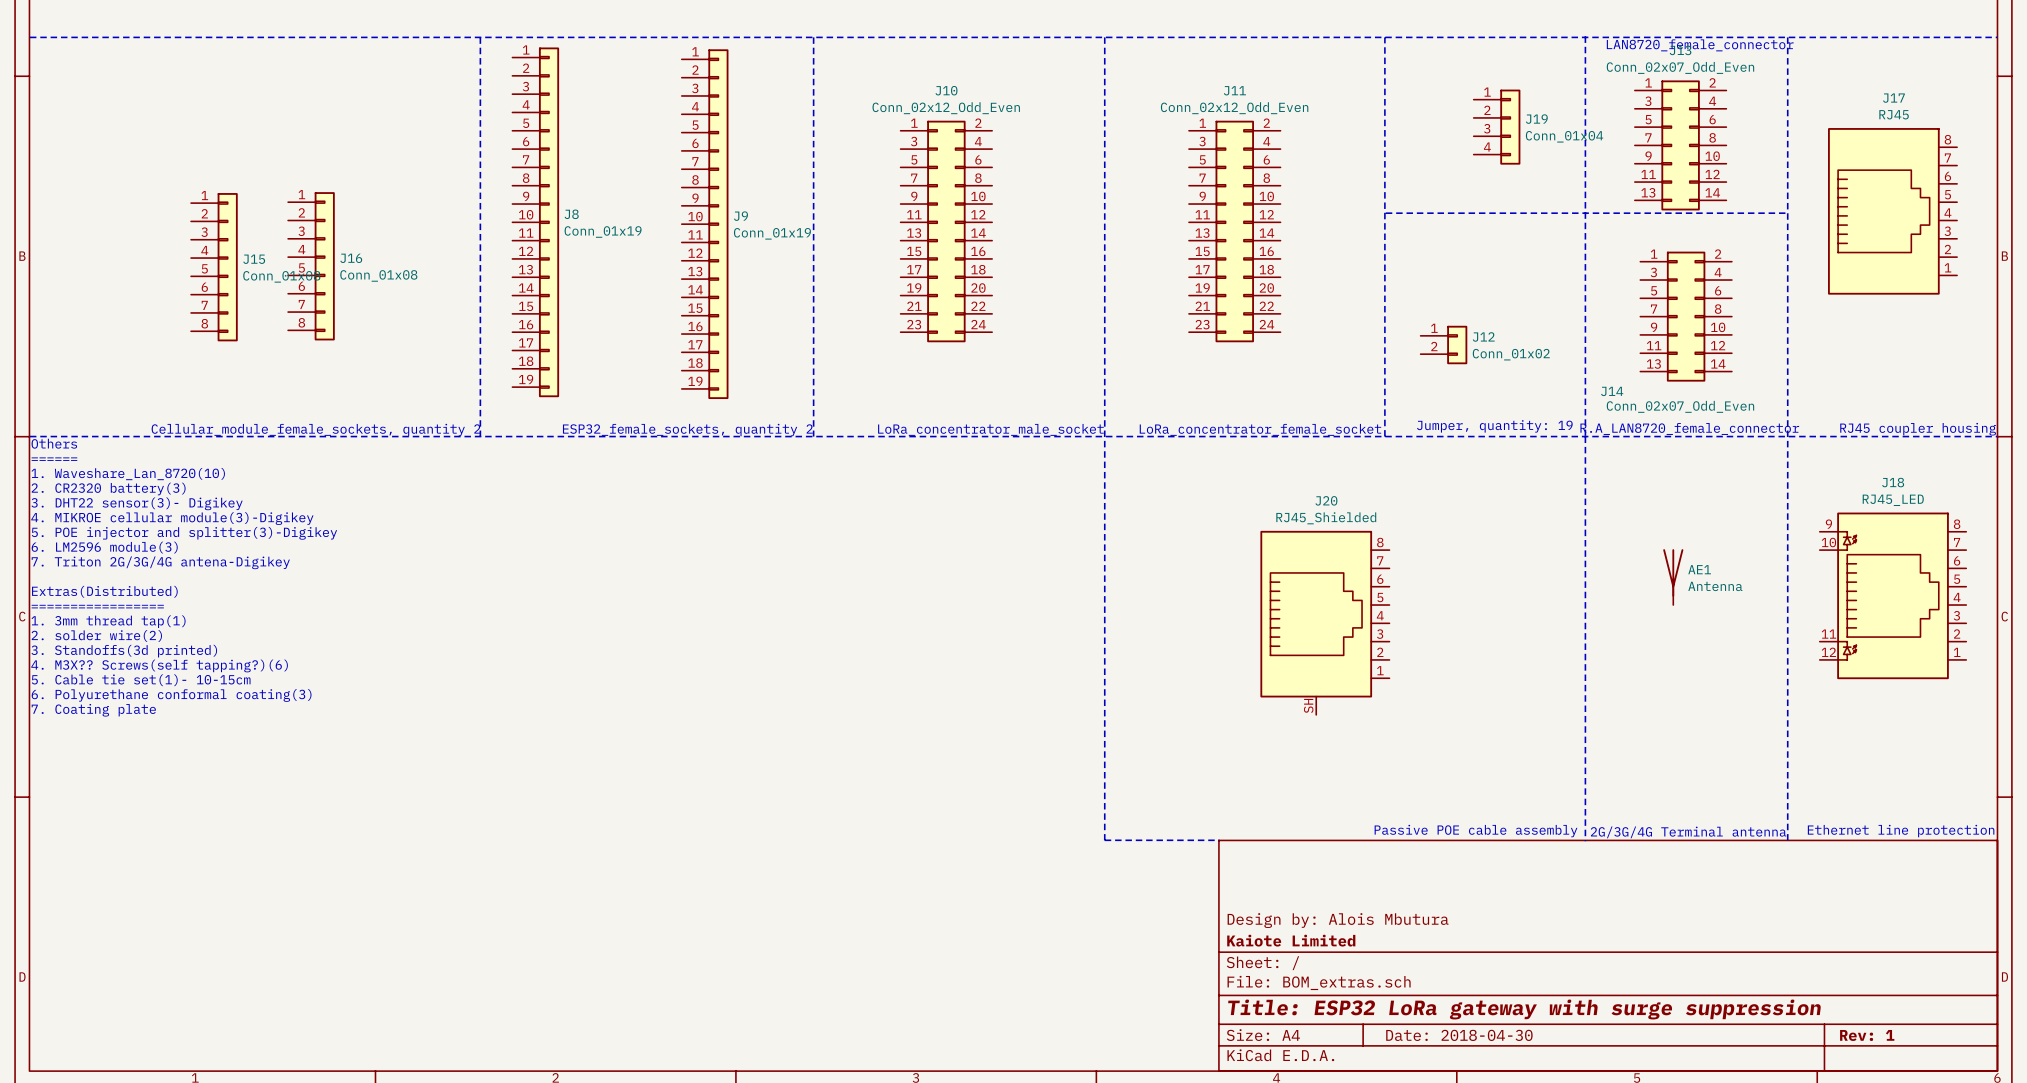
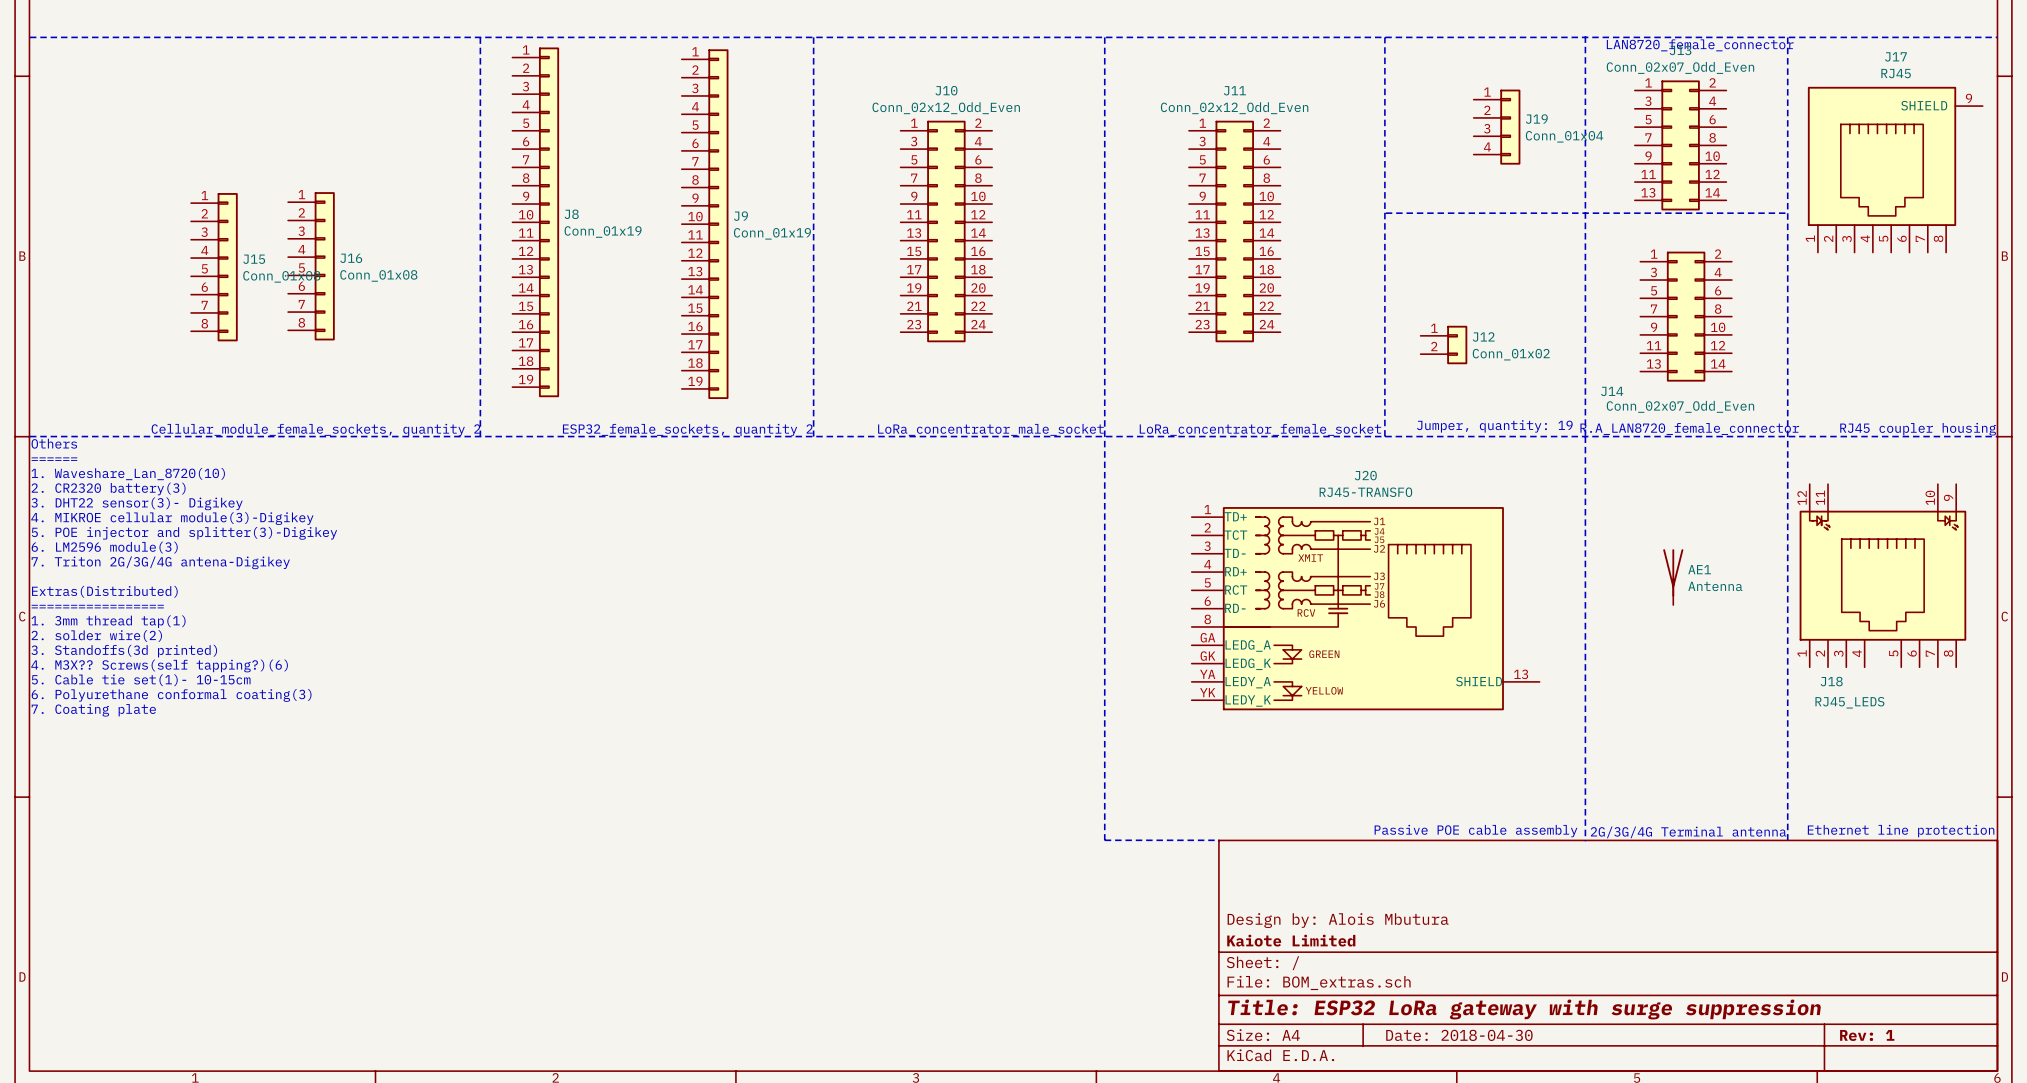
J17 symbol: [1828, 128, 1958, 295] -> [1807, 86, 1983, 253]
J18 name position: J18 (1893, 482) -> J18 (1831, 681)
J18 value: RJ45_LED (1893, 500) -> RJ45_LEDS (1849, 702)
J18 symbol: [1819, 512, 1967, 680] -> [1799, 484, 1967, 668]
J20 value: RJ45_Shielded (1326, 518) -> RJ45-TRANSFO (1365, 492)
J20 symbol: [1260, 530, 1390, 715] -> [1191, 507, 1540, 711]

